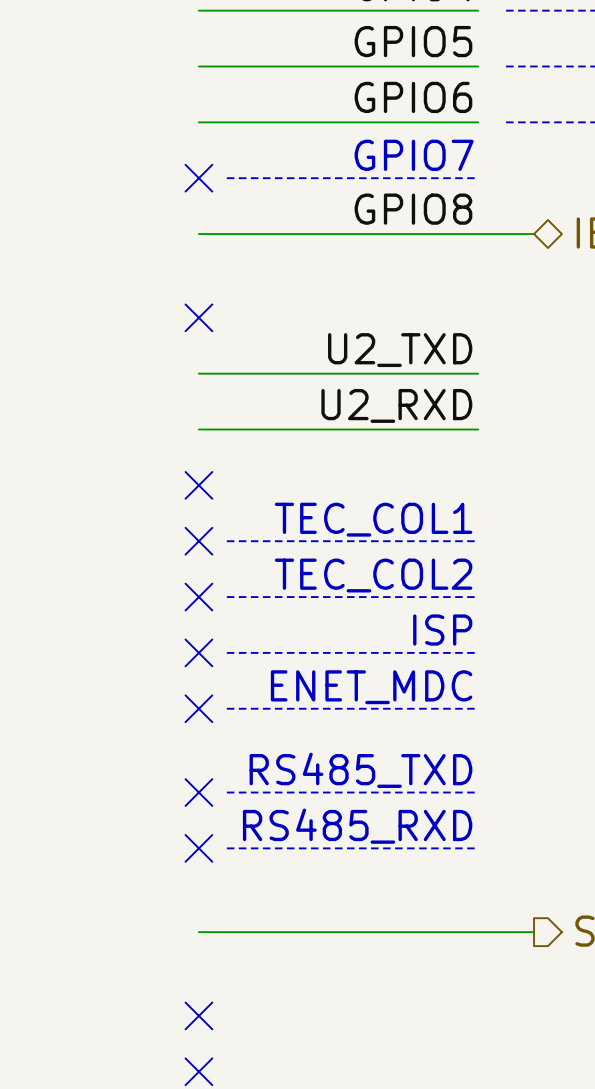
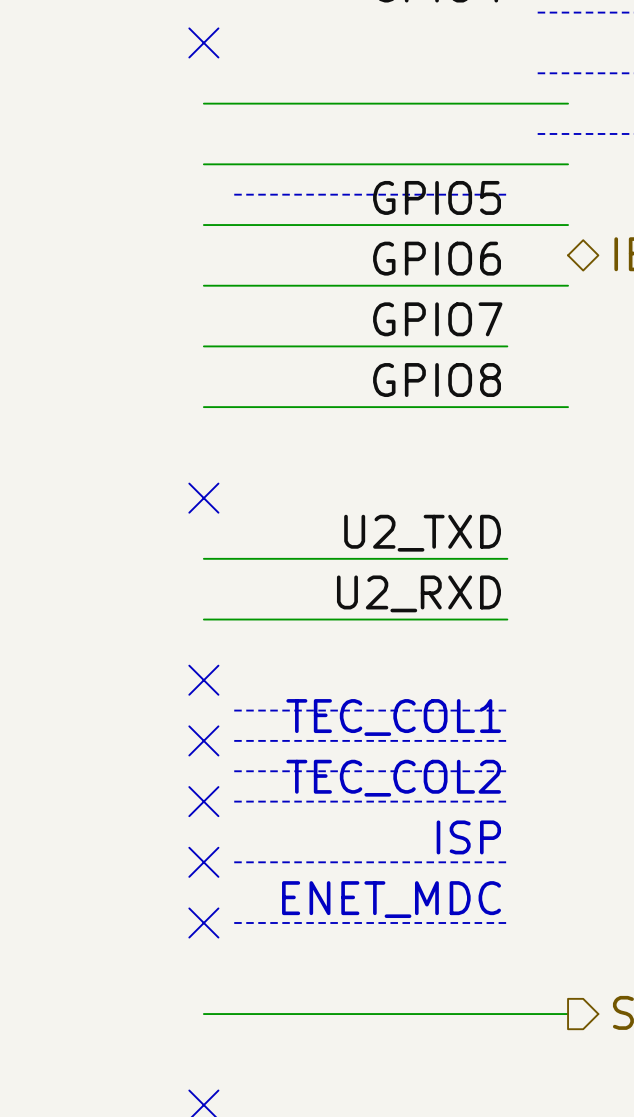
wire: (198, 10) (478, 10) -> none
no-connect mark: none -> (203, 42)
label position: GPIO5 (413, 41) -> GPIO5 (437, 197)
wire: (198, 66) (478, 66) -> (203, 558) (507, 558)
wire: none -> (203, 103) (568, 103)
label position: GPIO6 (413, 97) -> GPIO6 (437, 258)
wire: (198, 122) (478, 122) -> (203, 619) (507, 619)
wire: none -> (203, 164) (568, 164)
text: GPIO7 (414, 155) -> none
no-connect mark: (198, 178) -> none
wire: none -> (203, 225) (568, 225)
label: GPIO8 (413, 209) -> none
wire: (198, 234) (534, 234) -> (203, 285) (568, 285)
label: none -> GPIO7 (437, 319)
no-connect mark: (198, 317) -> none
label: U2_TXD (400, 350) -> GPIO8 (437, 380)
wire: none -> (507, 407) (568, 407)
label position: U2_RXD (396, 405) -> U2_RXD (418, 593)
wire: (198, 429) (478, 429) -> (203, 346) (507, 346)
no-connect mark position: (198, 485) -> (203, 498)
label: none -> U2_TXD (422, 533)
text position: TEC_COL1 (373, 519) -> TEC_COL1 (393, 717)
no-connect mark: (198, 541) -> none
line: (226, 541) (478, 541) -> (234, 740) (507, 740)
text position: TEC_COL2 (373, 575) -> TEC_COL2 (393, 778)
no-connect mark: (198, 597) -> none
line: (226, 597) (478, 597) -> (234, 801) (507, 801)
no-connect mark: none -> (203, 680)
text: ISP (442, 630) -> none
no-connect mark: (198, 652) -> none
no-connect mark: none -> (203, 740)
text: ENET_MDC (371, 687) -> none
no-connect mark: (198, 708) -> none
no-connect mark: none -> (203, 801)
text: RS485_TXD (360, 770) -> ISP (468, 837)
text: RS485_RXD (357, 826) -> ENET_MDC (391, 899)

